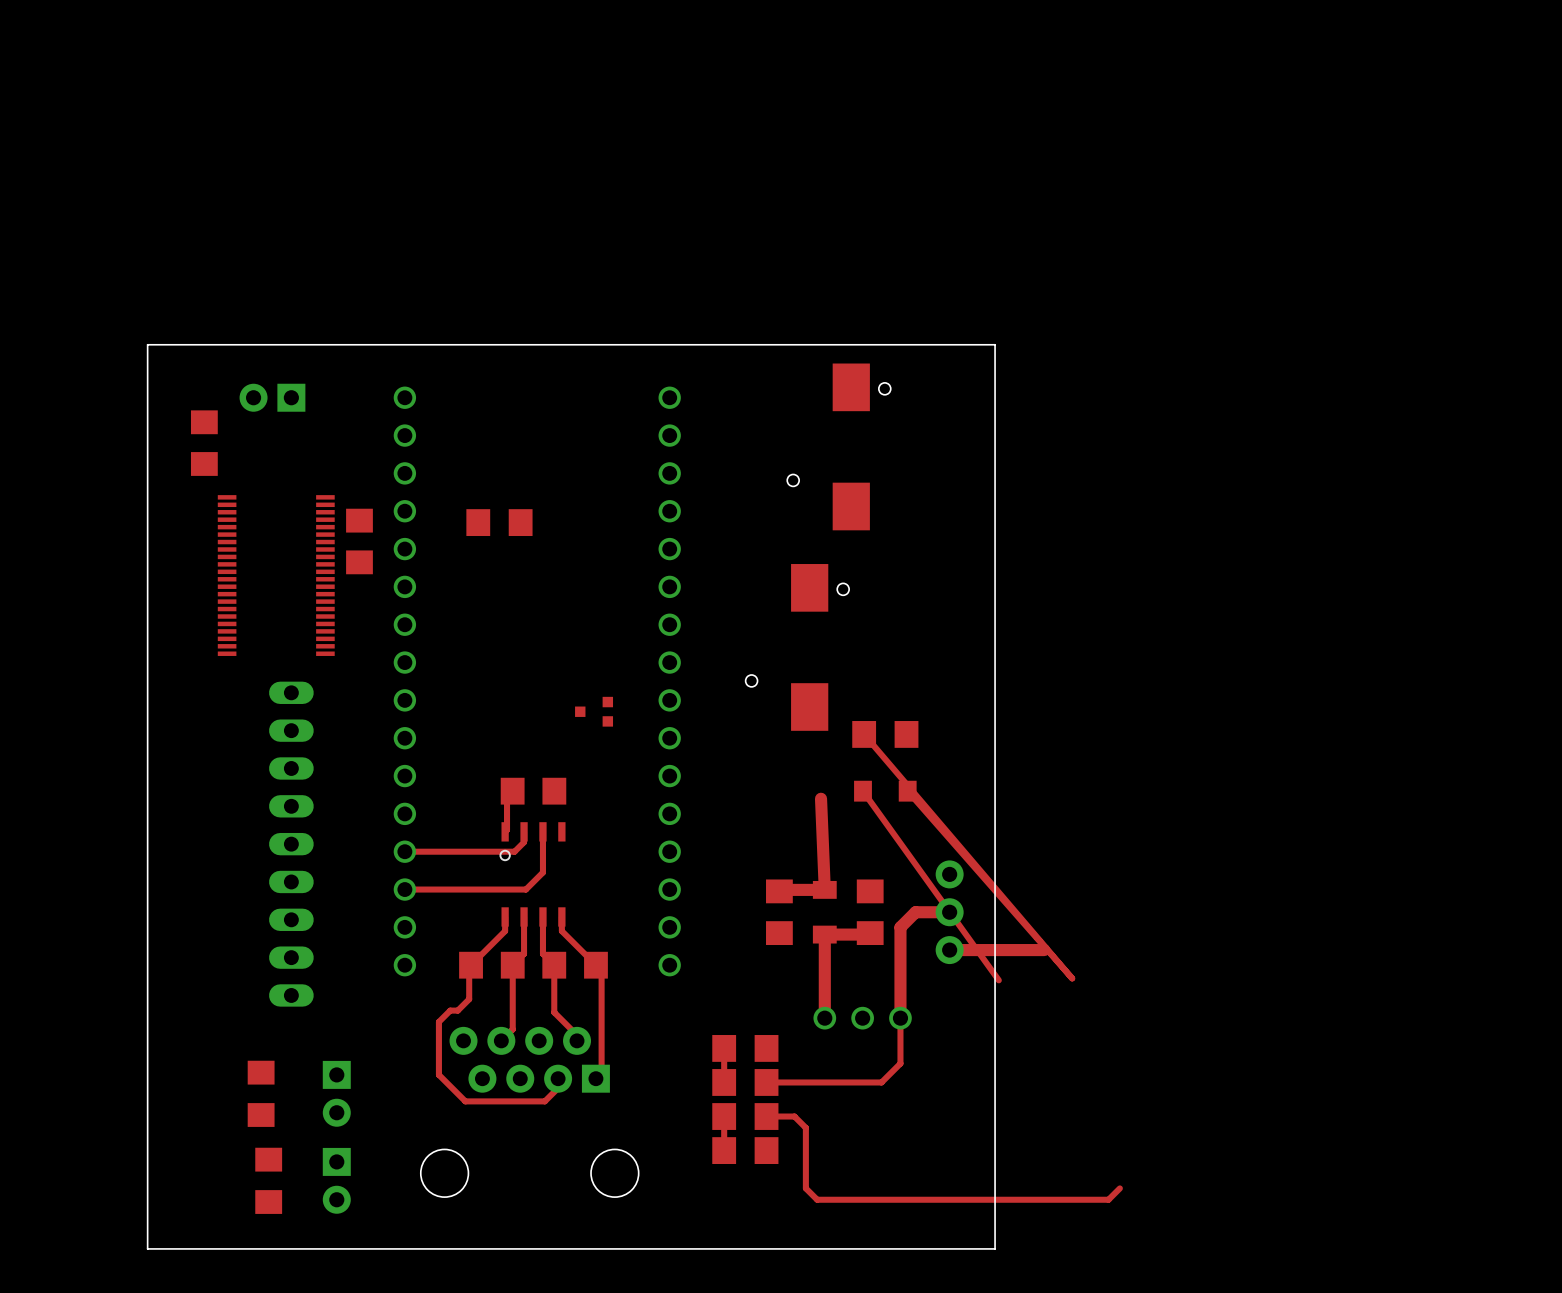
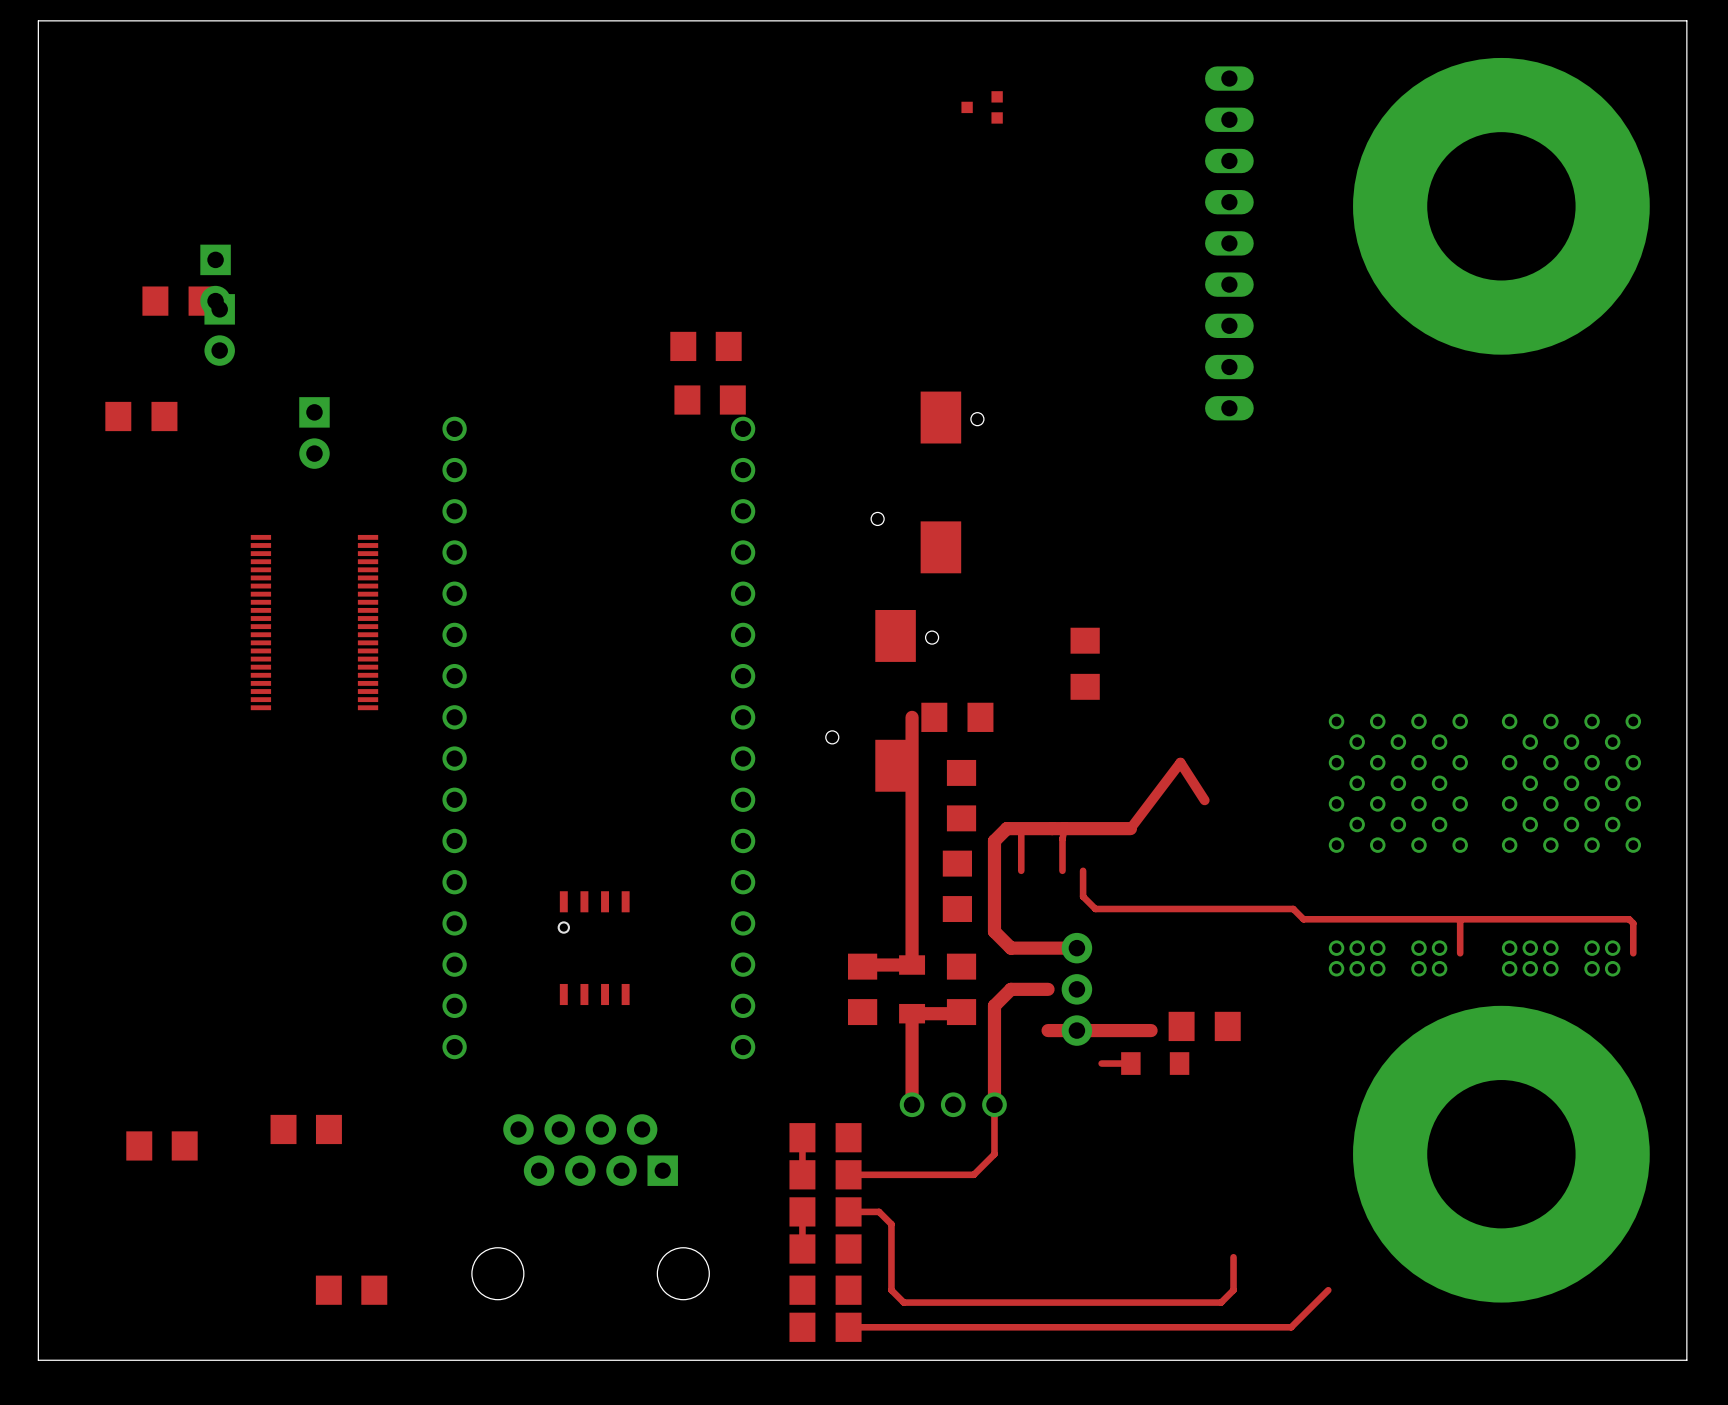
board edge: none -> (1686, 20) (38, 20) (38, 1360) (1686, 1360) (1686, 20)
part: none -> (982, 107)
part: none -> (1501, 206)
part: none -> (1229, 243)
part: none -> (215, 280)
part: none -> (178, 301)
part: none -> (219, 329)
part: none -> (706, 346)
board edge: (995, 344) (147, 344) (147, 1248) (995, 1248) (995, 344) -> none
part: none -> (710, 400)
part: none -> (141, 416)
part rotation: 0° (272, 397) -> 90° counterclockwise (314, 432)
part: (204, 443) -> none
part: (499, 522) -> none
part: (359, 541) -> none
part: none -> (1085, 663)
via: none -> (1336, 721)
via: none -> (1377, 721)
via: none -> (1418, 721)
via: none -> (1460, 721)
via: none -> (1509, 721)
via: none -> (1550, 721)
via: none -> (1592, 721)
via: none -> (1633, 721)
via: none -> (1357, 742)
via: none -> (1398, 742)
via: none -> (1439, 742)
via: none -> (1530, 742)
via: none -> (1571, 742)
via: none -> (1612, 742)
via: none -> (1336, 762)
via: none -> (1377, 762)
via: none -> (1418, 762)
via: none -> (1460, 762)
via: none -> (1509, 762)
via: none -> (1550, 762)
via: none -> (1592, 762)
via: none -> (1633, 762)
part: (594, 711) -> none
via: none -> (1357, 783)
via: none -> (1398, 783)
via: none -> (1439, 783)
via: none -> (1530, 783)
via: none -> (1571, 783)
via: none -> (1612, 783)
top track: (864, 734) (1072, 978) (907, 791) -> none
part: none -> (961, 795)
part position: (885, 734) -> (957, 717)
top track: none -> (1204, 800) (1180, 762) (1130, 828) (1006, 828) (994, 840) (994, 931) (1010, 948) (1076, 948)
via: none -> (1336, 803)
via: none -> (1377, 803)
via: none -> (1418, 803)
via: none -> (1460, 803)
via: none -> (1509, 803)
via: none -> (1550, 803)
via: none -> (1592, 803)
via: none -> (1633, 803)
via: none -> (1357, 824)
via: none -> (1398, 824)
via: none -> (1439, 824)
via: none -> (1530, 824)
via: none -> (1571, 824)
via: none -> (1612, 824)
top track: none -> (1052, 828) (1021, 826) (1021, 870)
top track: none -> (1064, 828) (1062, 838) (1062, 870)
via: none -> (1336, 845)
via: none -> (1377, 845)
via: none -> (1418, 845)
via: none -> (1460, 845)
via: none -> (1509, 845)
via: none -> (1550, 845)
via: none -> (1592, 845)
via: none -> (1633, 845)
top track: (512, 791) (507, 796) (507, 829) (505, 831) -> none
part: (533, 791) -> none
top track: (862, 791) (998, 980) -> (1130, 1063) (1101, 1063)
part position: (885, 791) -> (1155, 1063)
top track: (821, 798) (824, 889) -> (912, 717) (912, 965)
top track: none -> (1083, 870) (1083, 896) (1095, 908) (1293, 908) (1303, 919) (1629, 919) (1633, 923) (1633, 953)
part: none -> (957, 886)
top track: (524, 831) (524, 842) (514, 851) (404, 851) -> none
top track: (542, 831) (542, 872) (525, 889) (404, 889) -> none
part: (291, 844) -> none
top track: none -> (1460, 919) (1460, 953)
via: none -> (1336, 948)
via: none -> (1357, 948)
via: none -> (1377, 948)
via: none -> (1418, 948)
via: none -> (1439, 948)
via: none -> (1509, 948)
via: none -> (1530, 948)
via: none -> (1550, 948)
via: none -> (1592, 948)
via: none -> (1612, 948)
via: none -> (1336, 968)
via: none -> (1357, 968)
via: none -> (1377, 968)
via: none -> (1418, 968)
via: none -> (1439, 968)
via: none -> (1509, 968)
via: none -> (1530, 968)
via: none -> (1550, 968)
via: none -> (1592, 968)
via: none -> (1612, 968)
part position: (949, 912) -> (1076, 989)
top track: (505, 916) (505, 931) (469, 967) (469, 999) (457, 1010) (450, 1010) (438, 1021) (438, 1074) (465, 1101) (544, 1101) (558, 1088) (558, 1078) -> none
top track: (524, 916) (524, 953) (512, 965) (512, 1029) (501, 1040) -> none
top track: (542, 916) (542, 953) (554, 965) (554, 1012) (575, 1033) (577, 1040) -> none
top track: (561, 916) (561, 931) (601, 972) (601, 1073) (595, 1078) -> none
part: none -> (1204, 1026)
part: (491, 965) -> none
part: (575, 965) -> none
part: none -> (306, 1129)
part: none -> (161, 1145)
part: none -> (1501, 1154)
part: (261, 1093) -> none
part: (336, 1093) -> none
top track: none -> (1233, 1257) (1233, 1290)
part: (268, 1180) -> none
part: (336, 1180) -> none
part: none -> (351, 1290)
part: none -> (825, 1290)
top track: none -> (1328, 1290) (1291, 1327) (848, 1327)
part: none -> (825, 1327)

